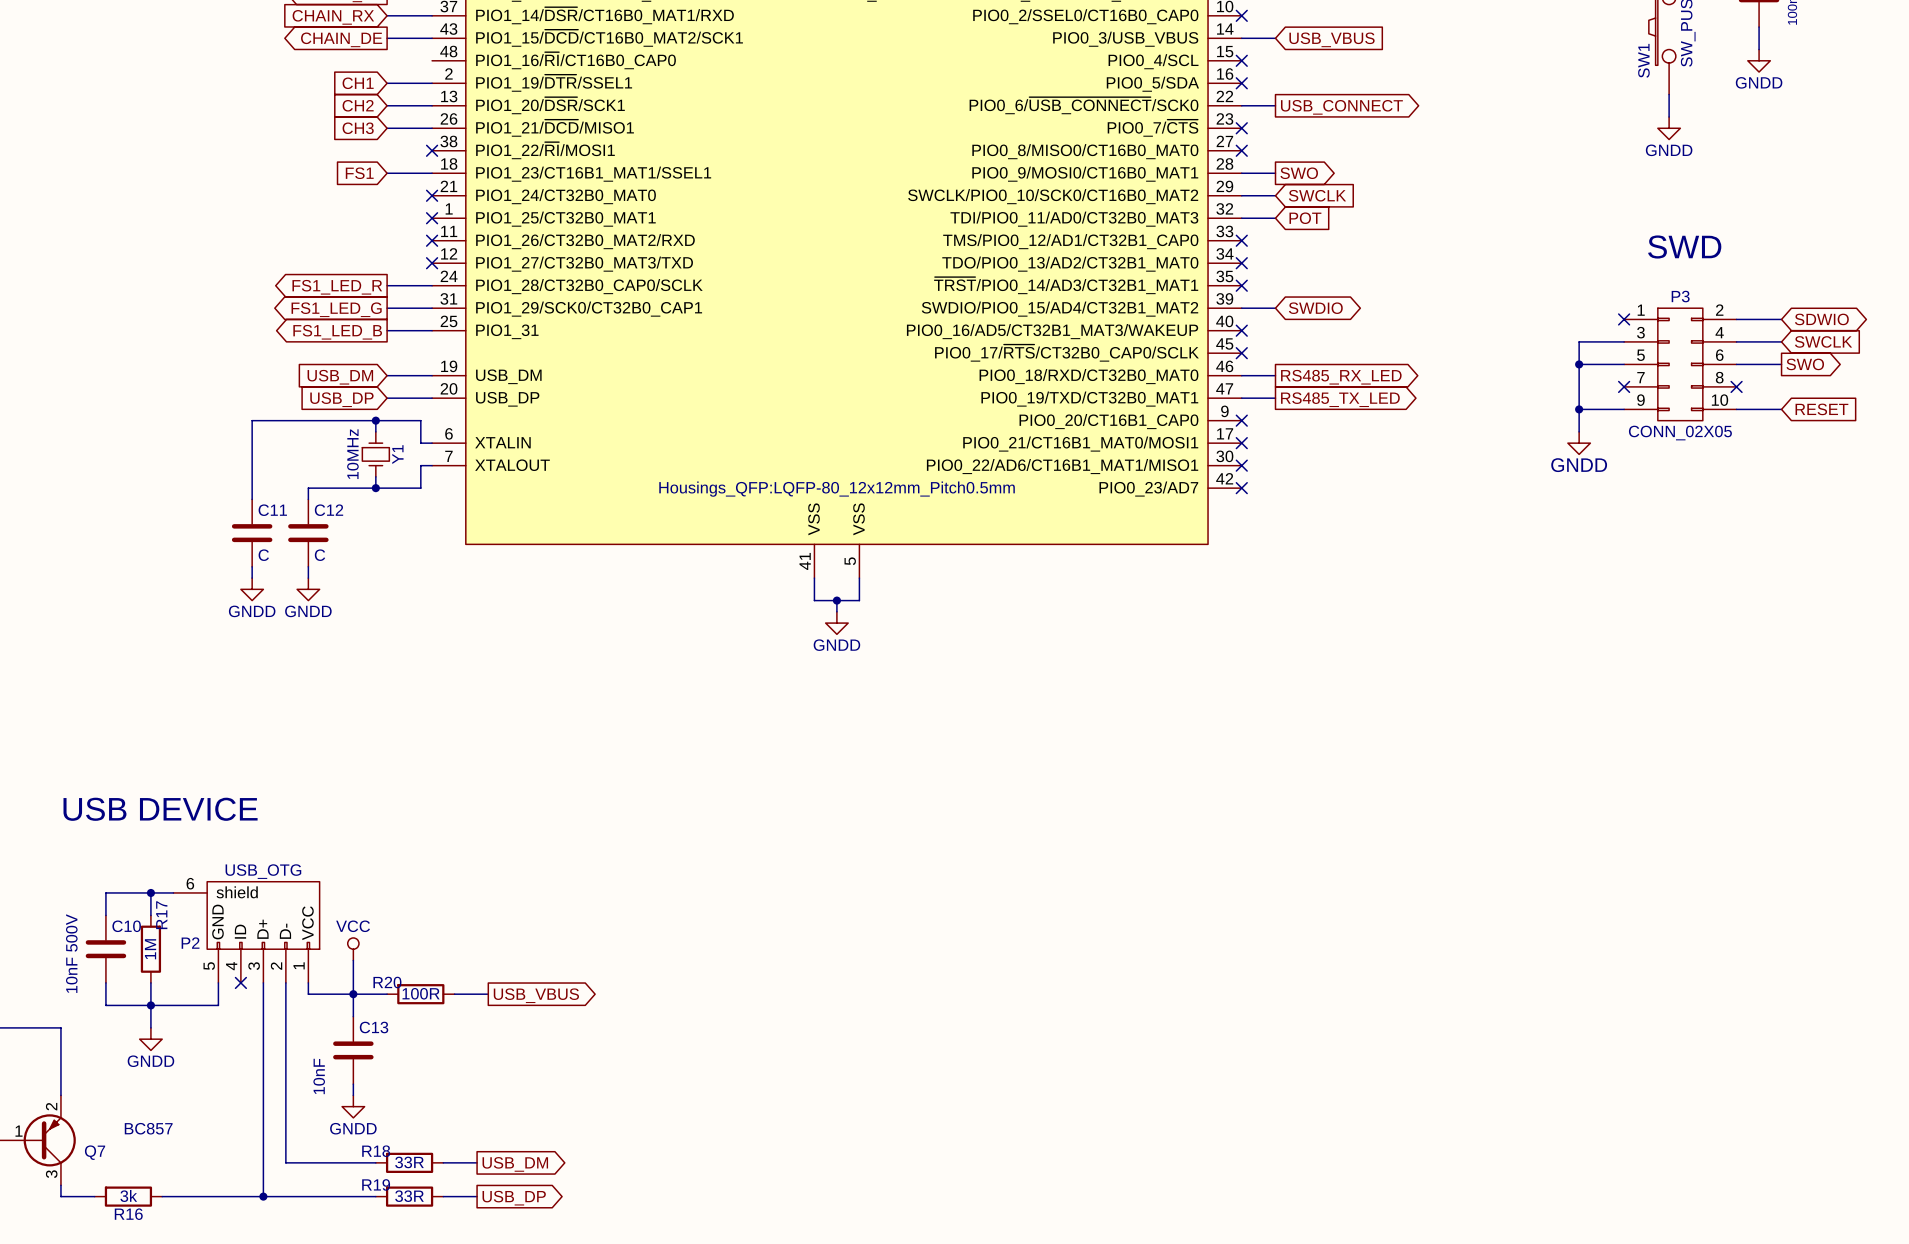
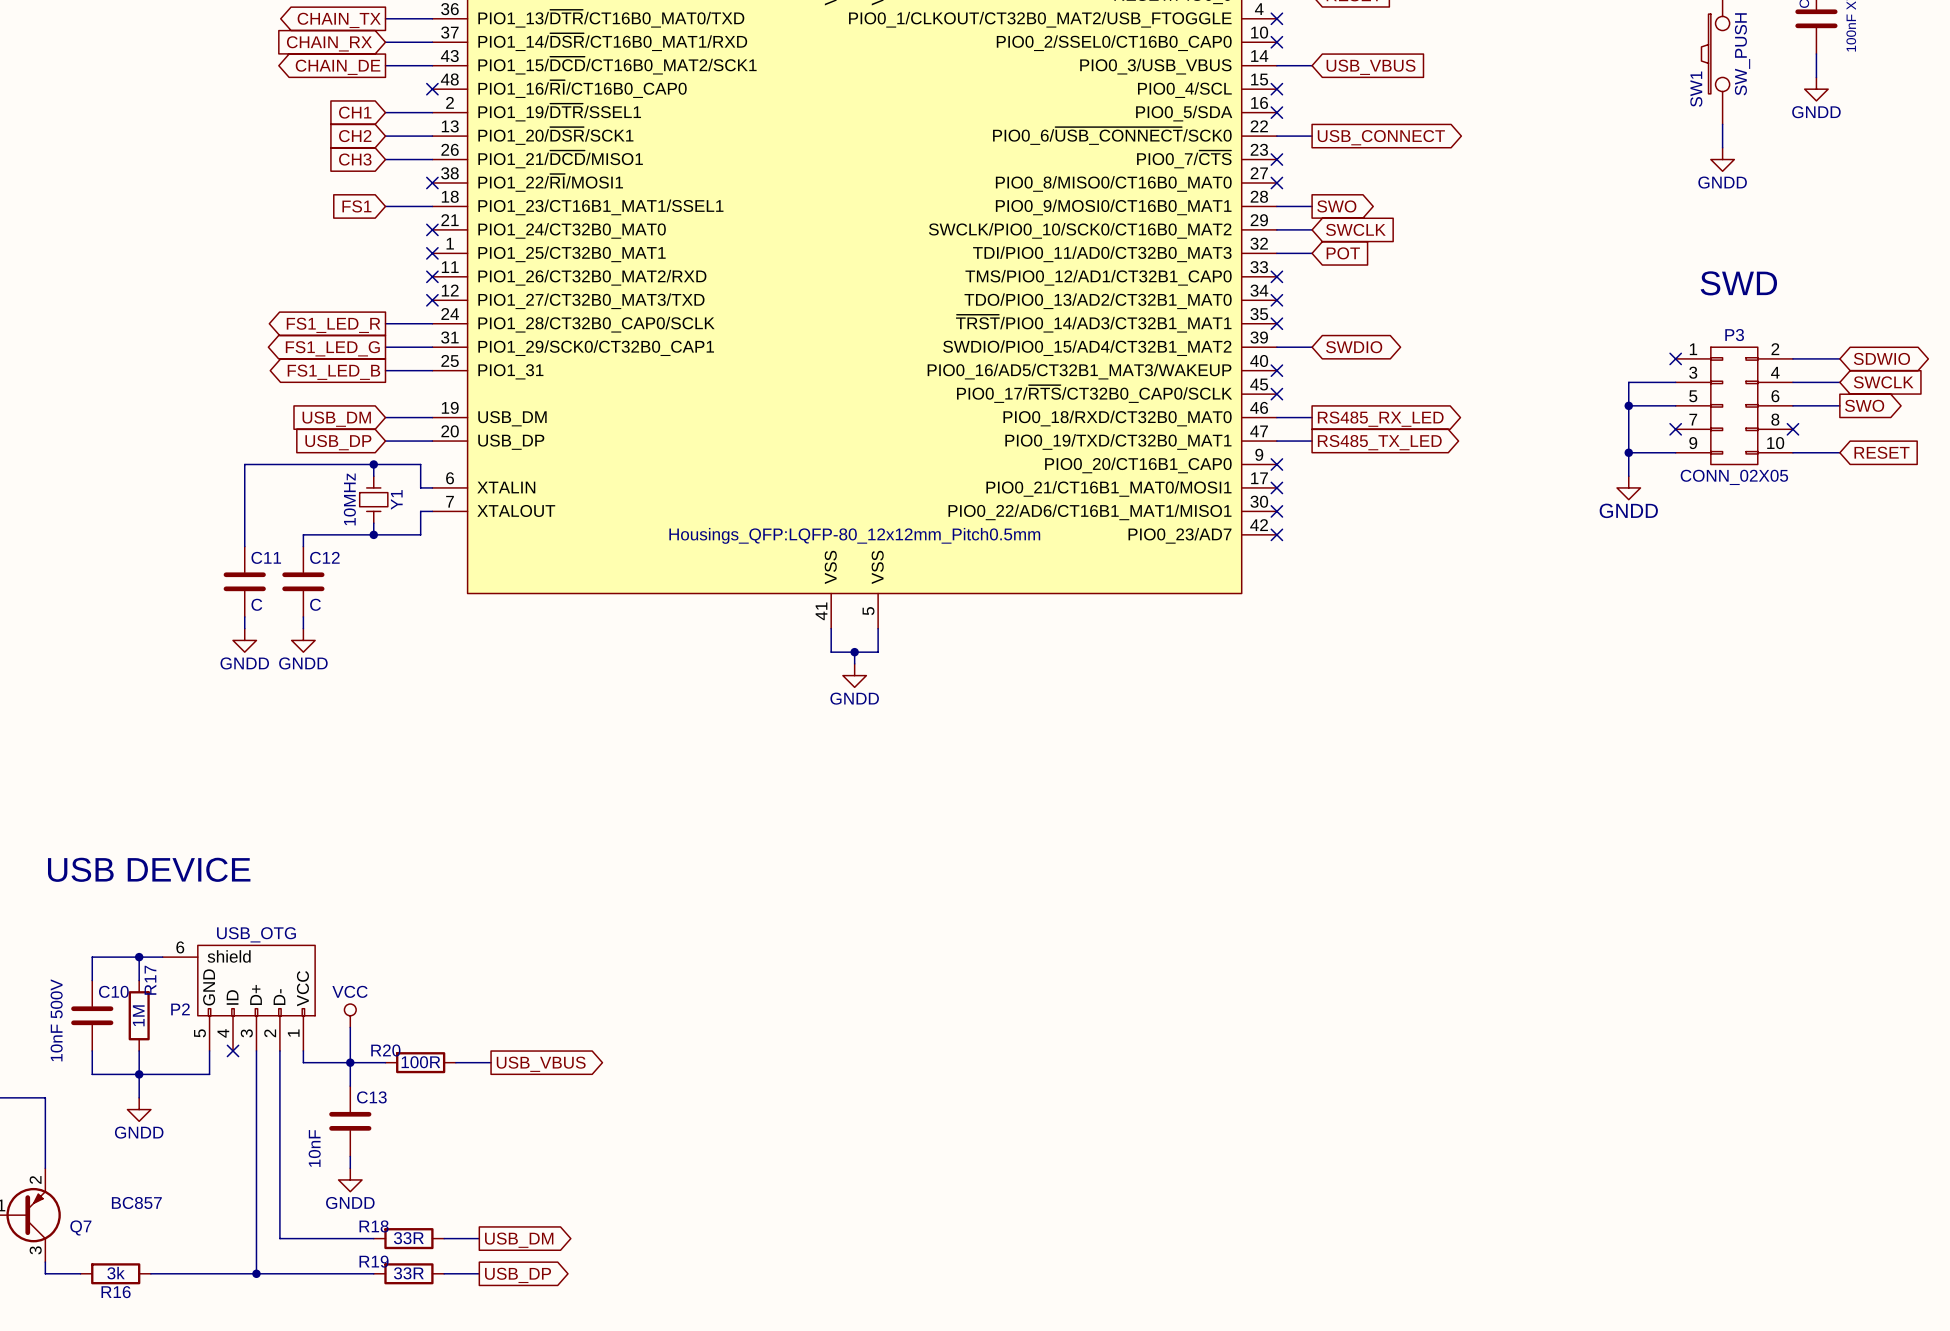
no-connect mark: none -> (432, 89)

